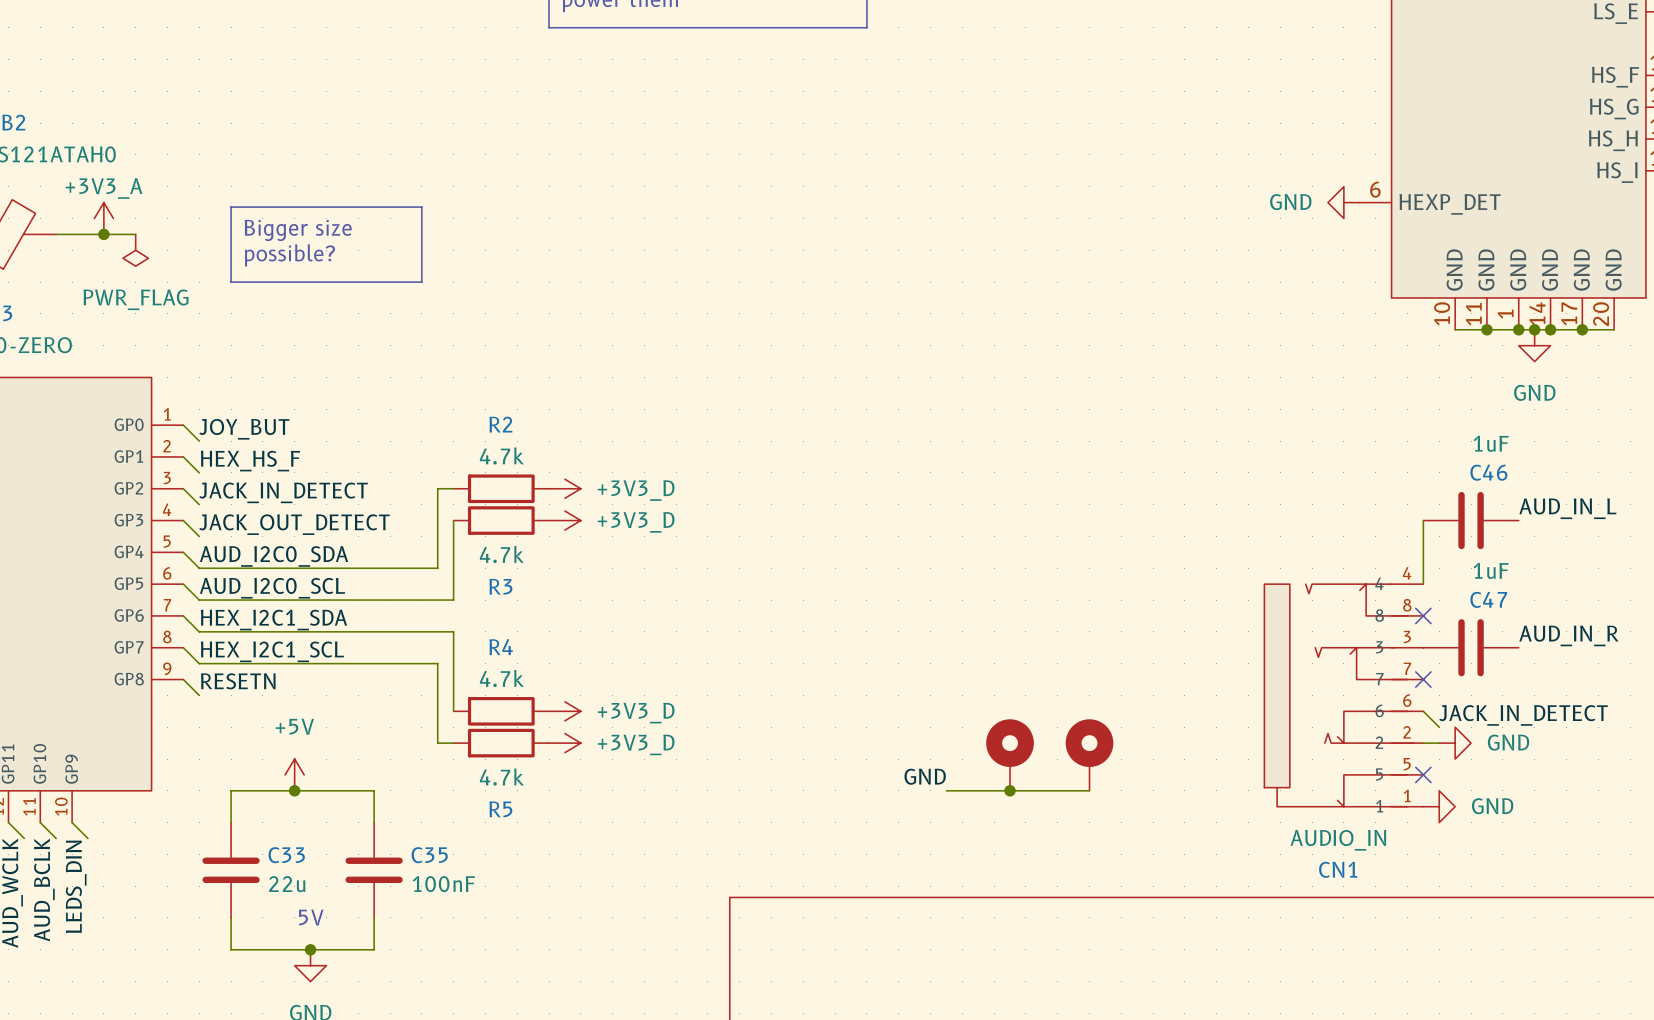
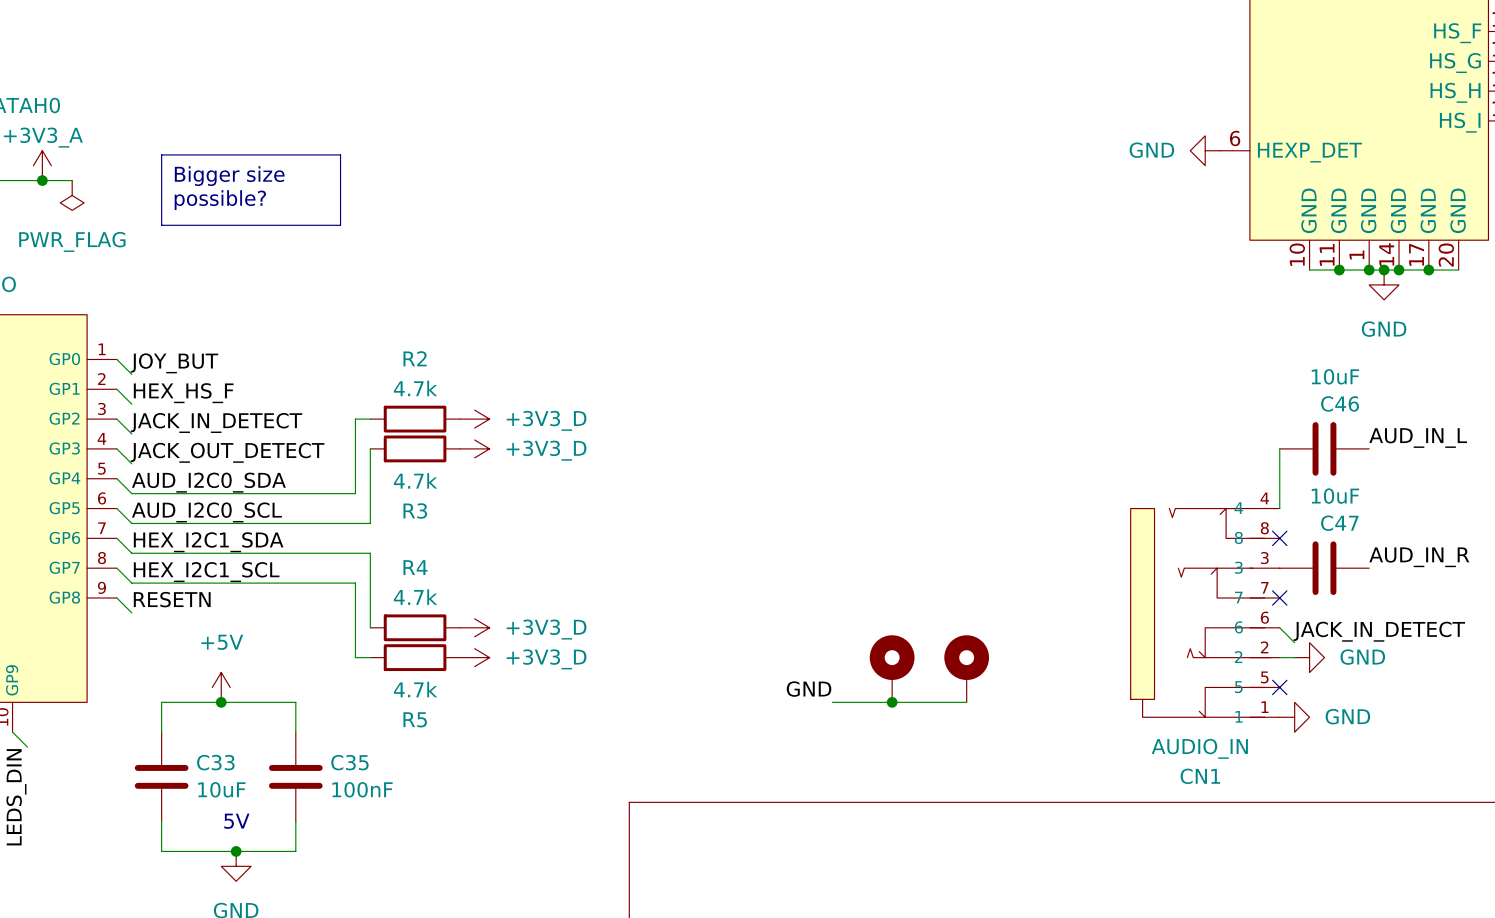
C46 value: 1uF (1491, 443) -> 10uF (1335, 376)
C47 value: 1uF (1491, 570) -> 10uF (1335, 496)
C33 value: 22u (287, 884) -> 10uF (221, 789)

